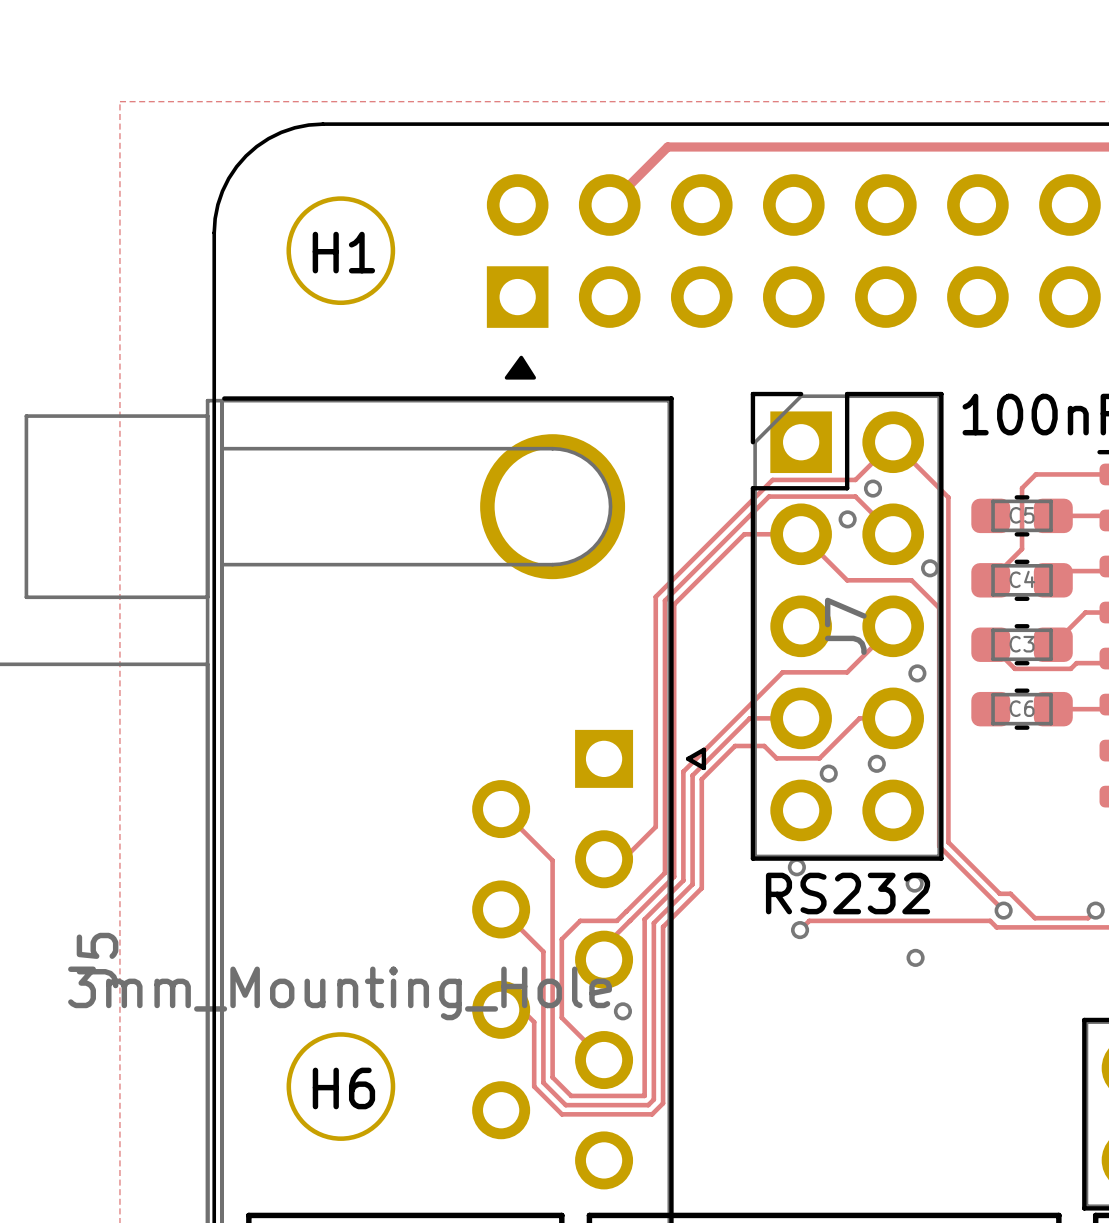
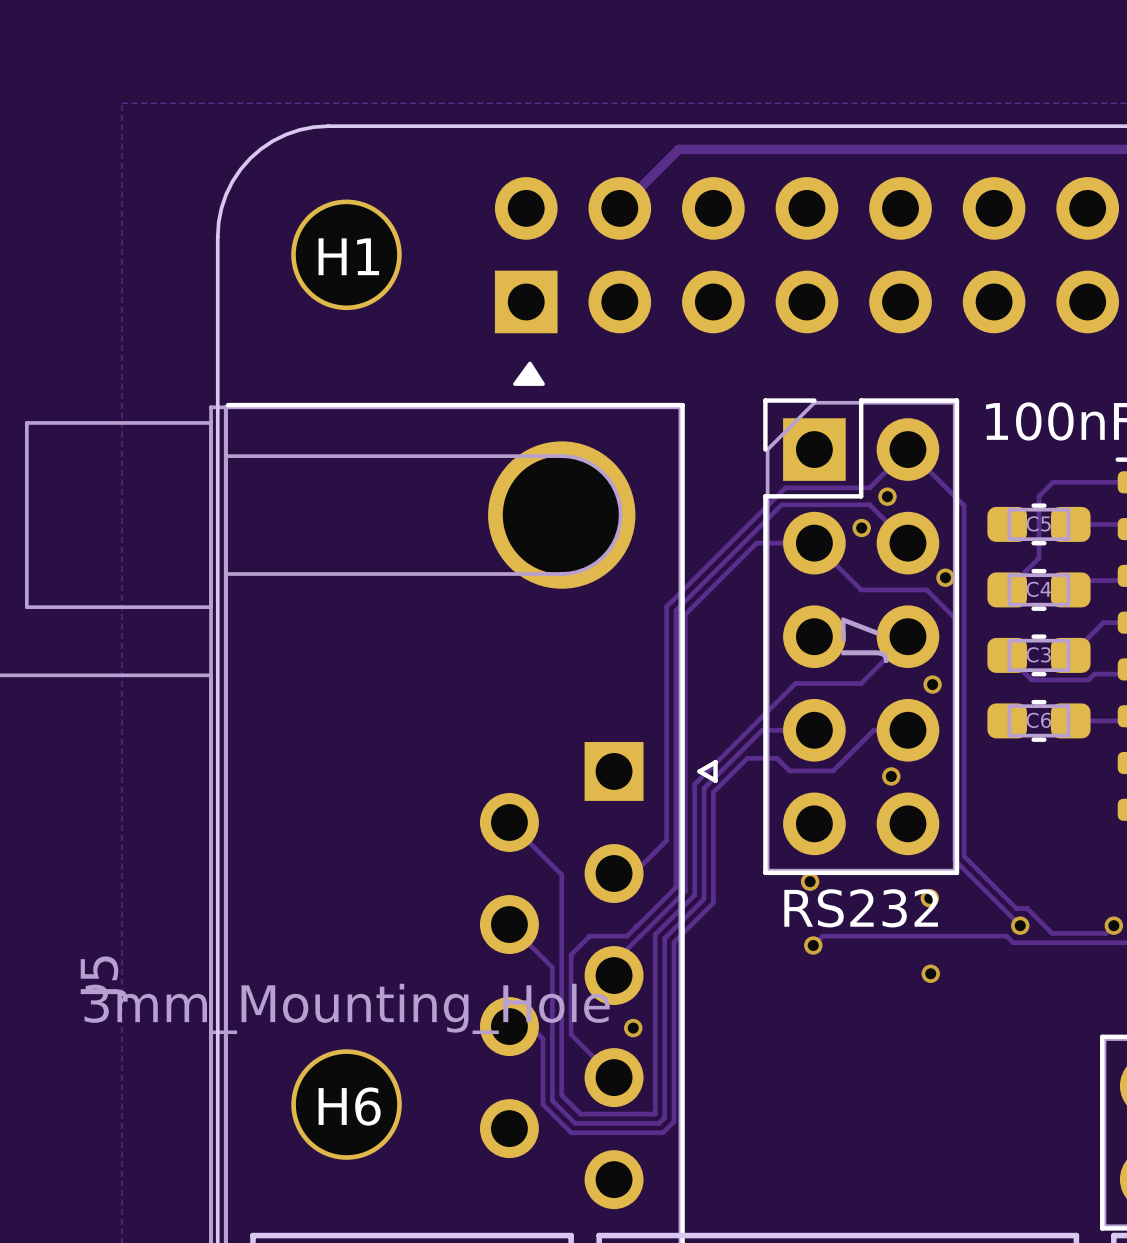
via: (828, 773) -> none

